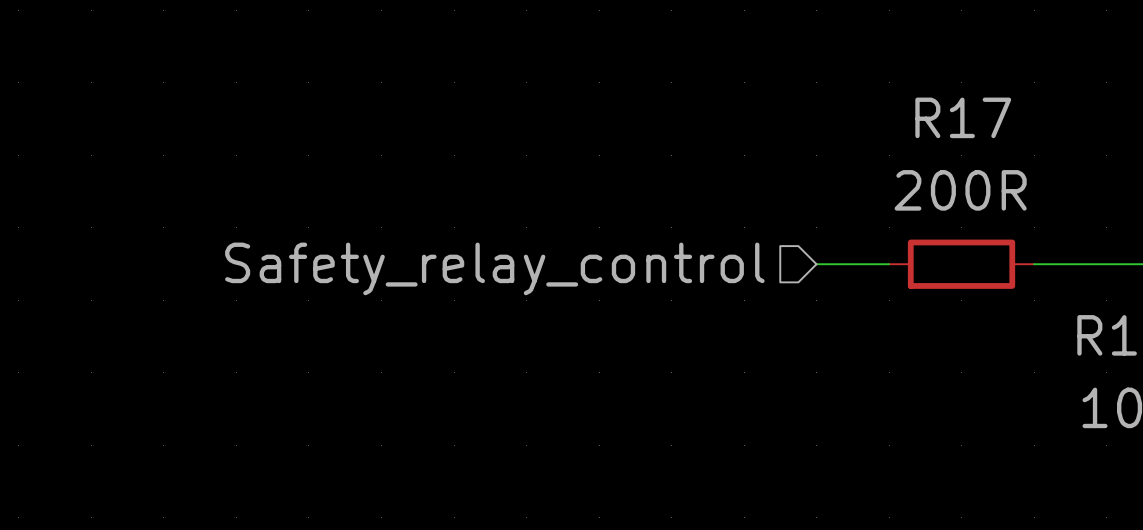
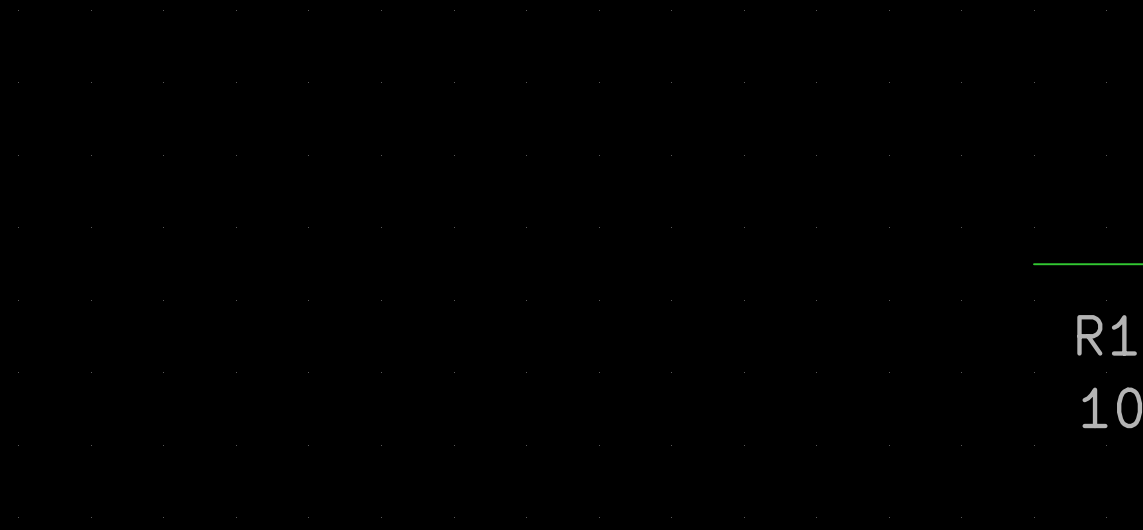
wire: (816, 264) (889, 264) -> none
R17: 200R (961, 264) -> none
hierarchical label: Safety_relay_control (494, 268) -> none

